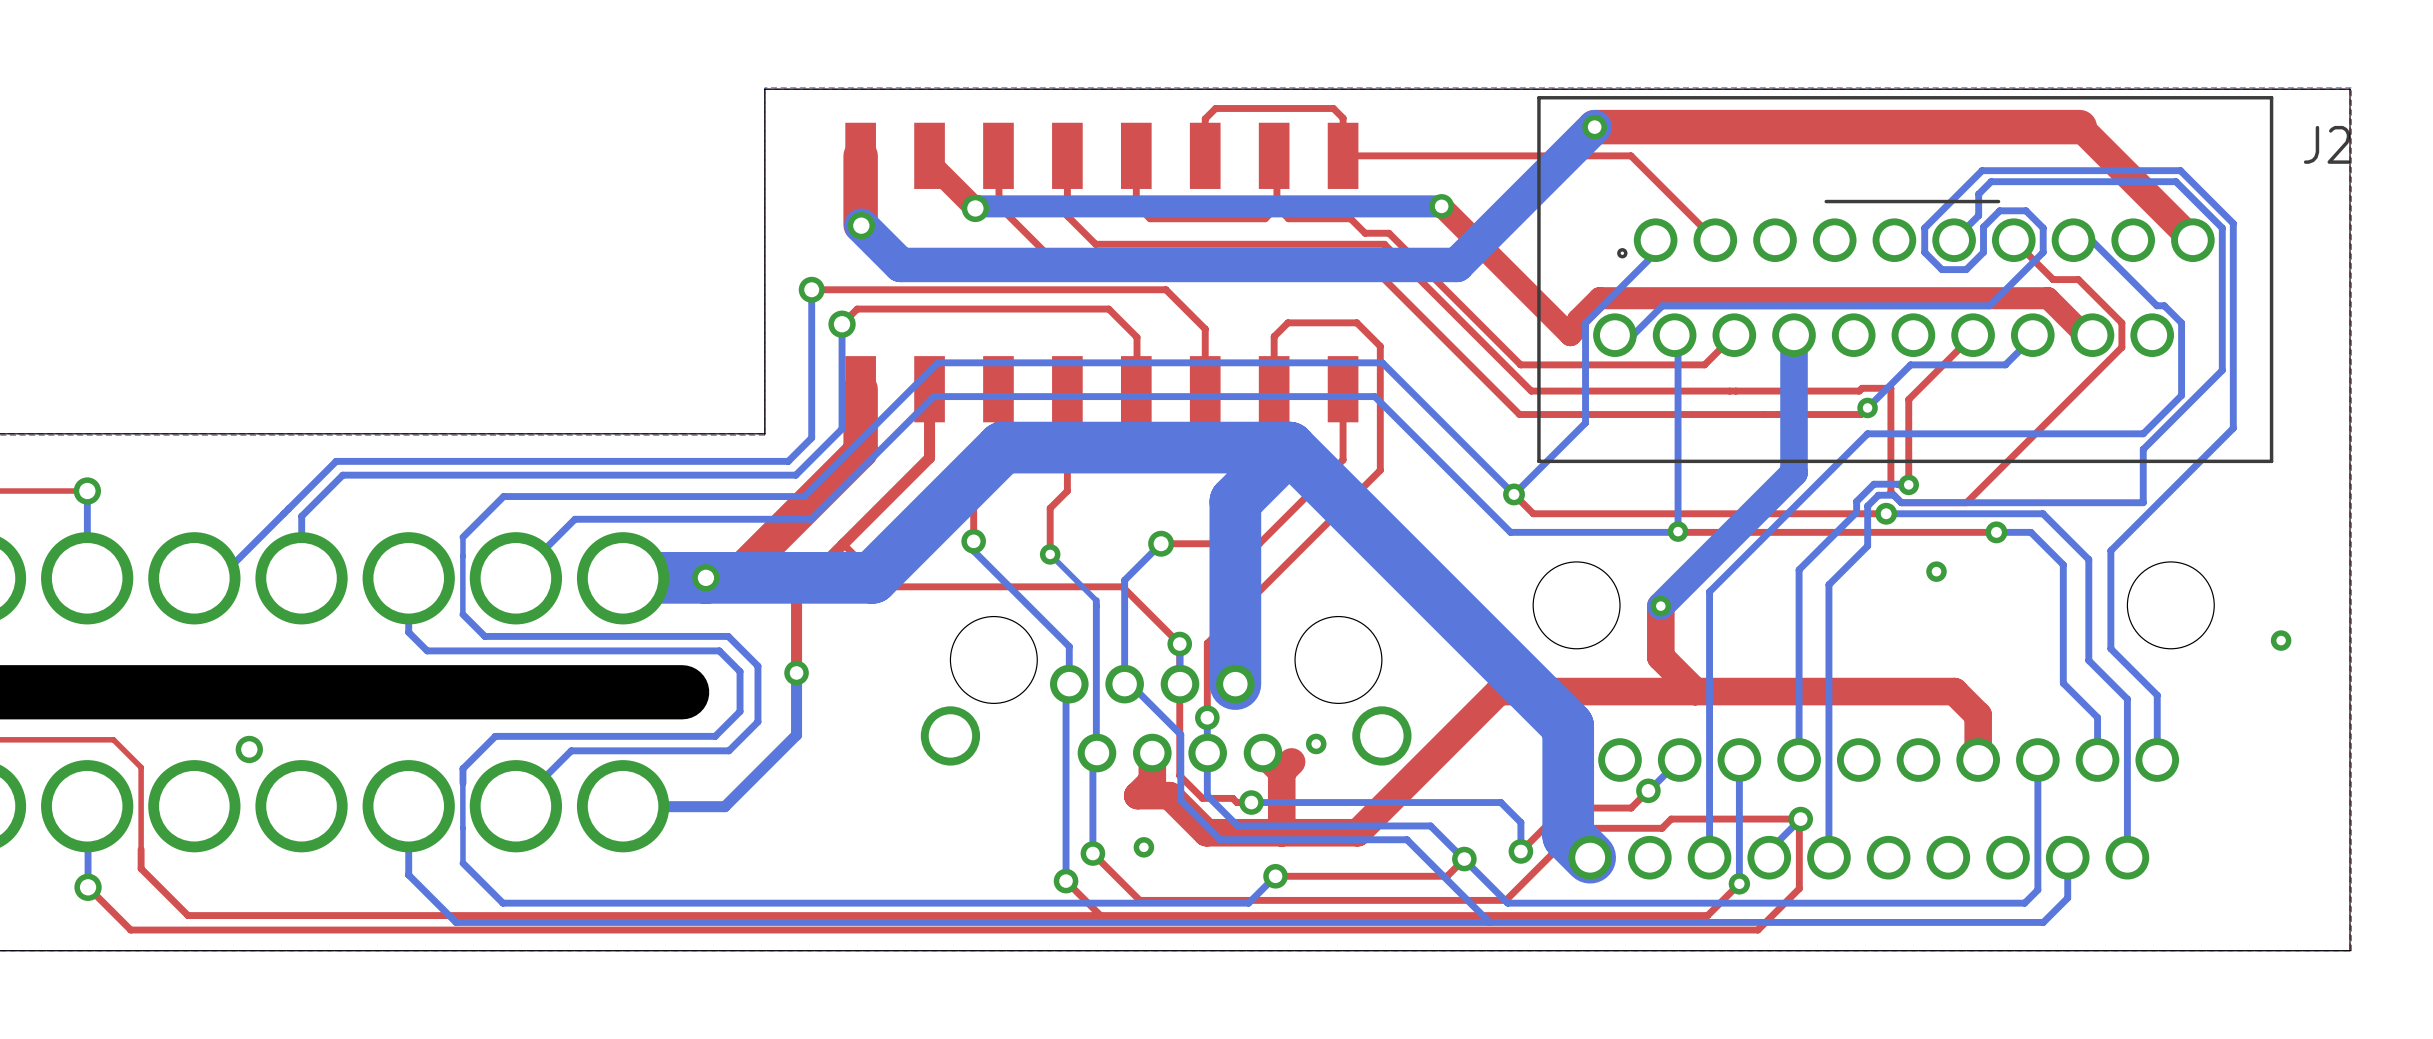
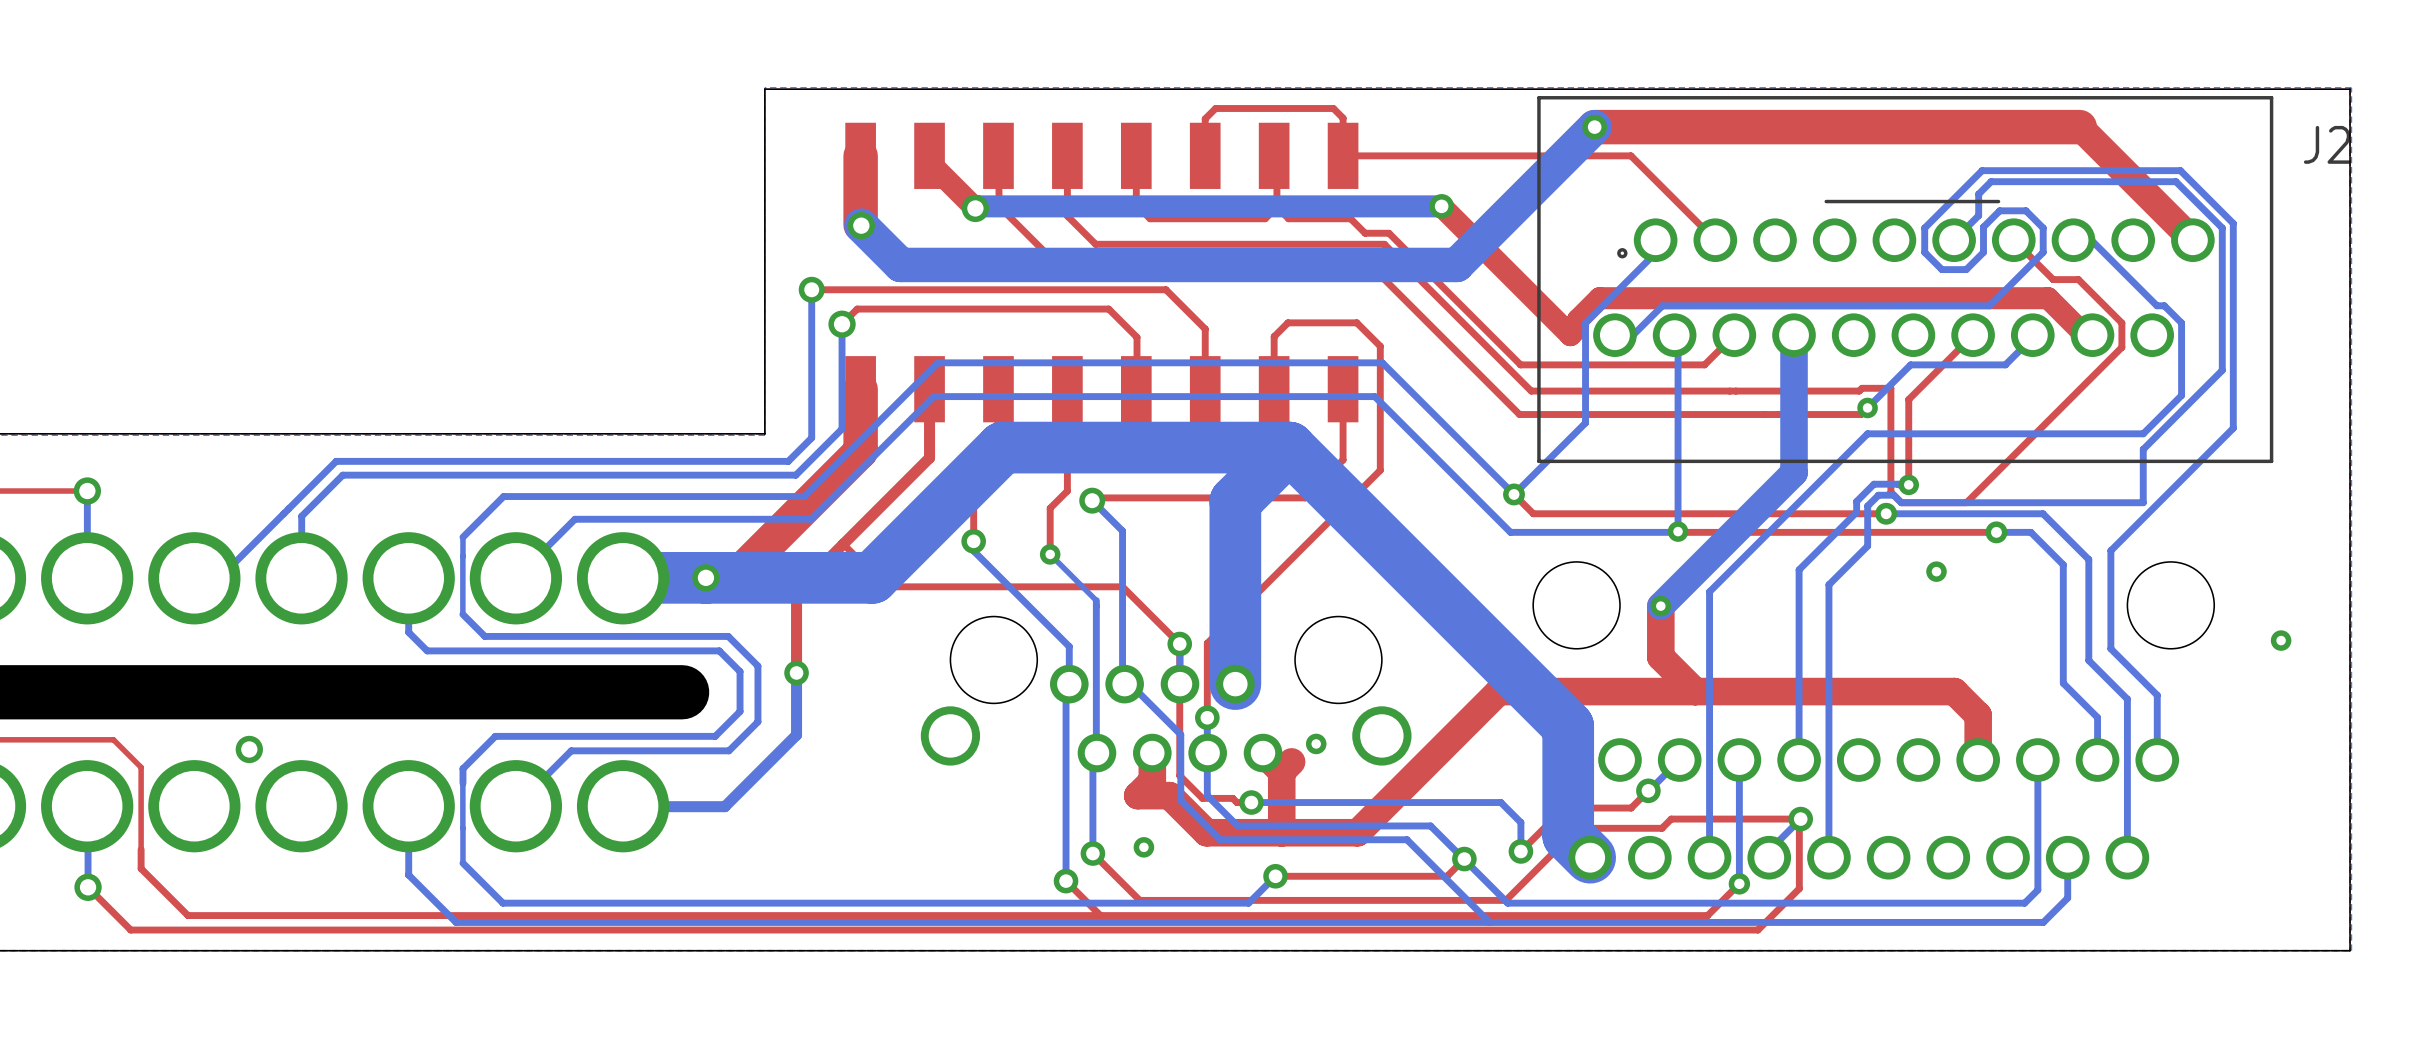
top track: (1305, 497) (1259, 543) (1161, 543) -> (1305, 497) (1094, 497) (1092, 500)
bottom track: none -> (1092, 500) (1122, 530) (1122, 682)
bottom track: (1161, 543) (1124, 580) (1124, 684) -> none
via position: (1161, 543) -> (1092, 500)

